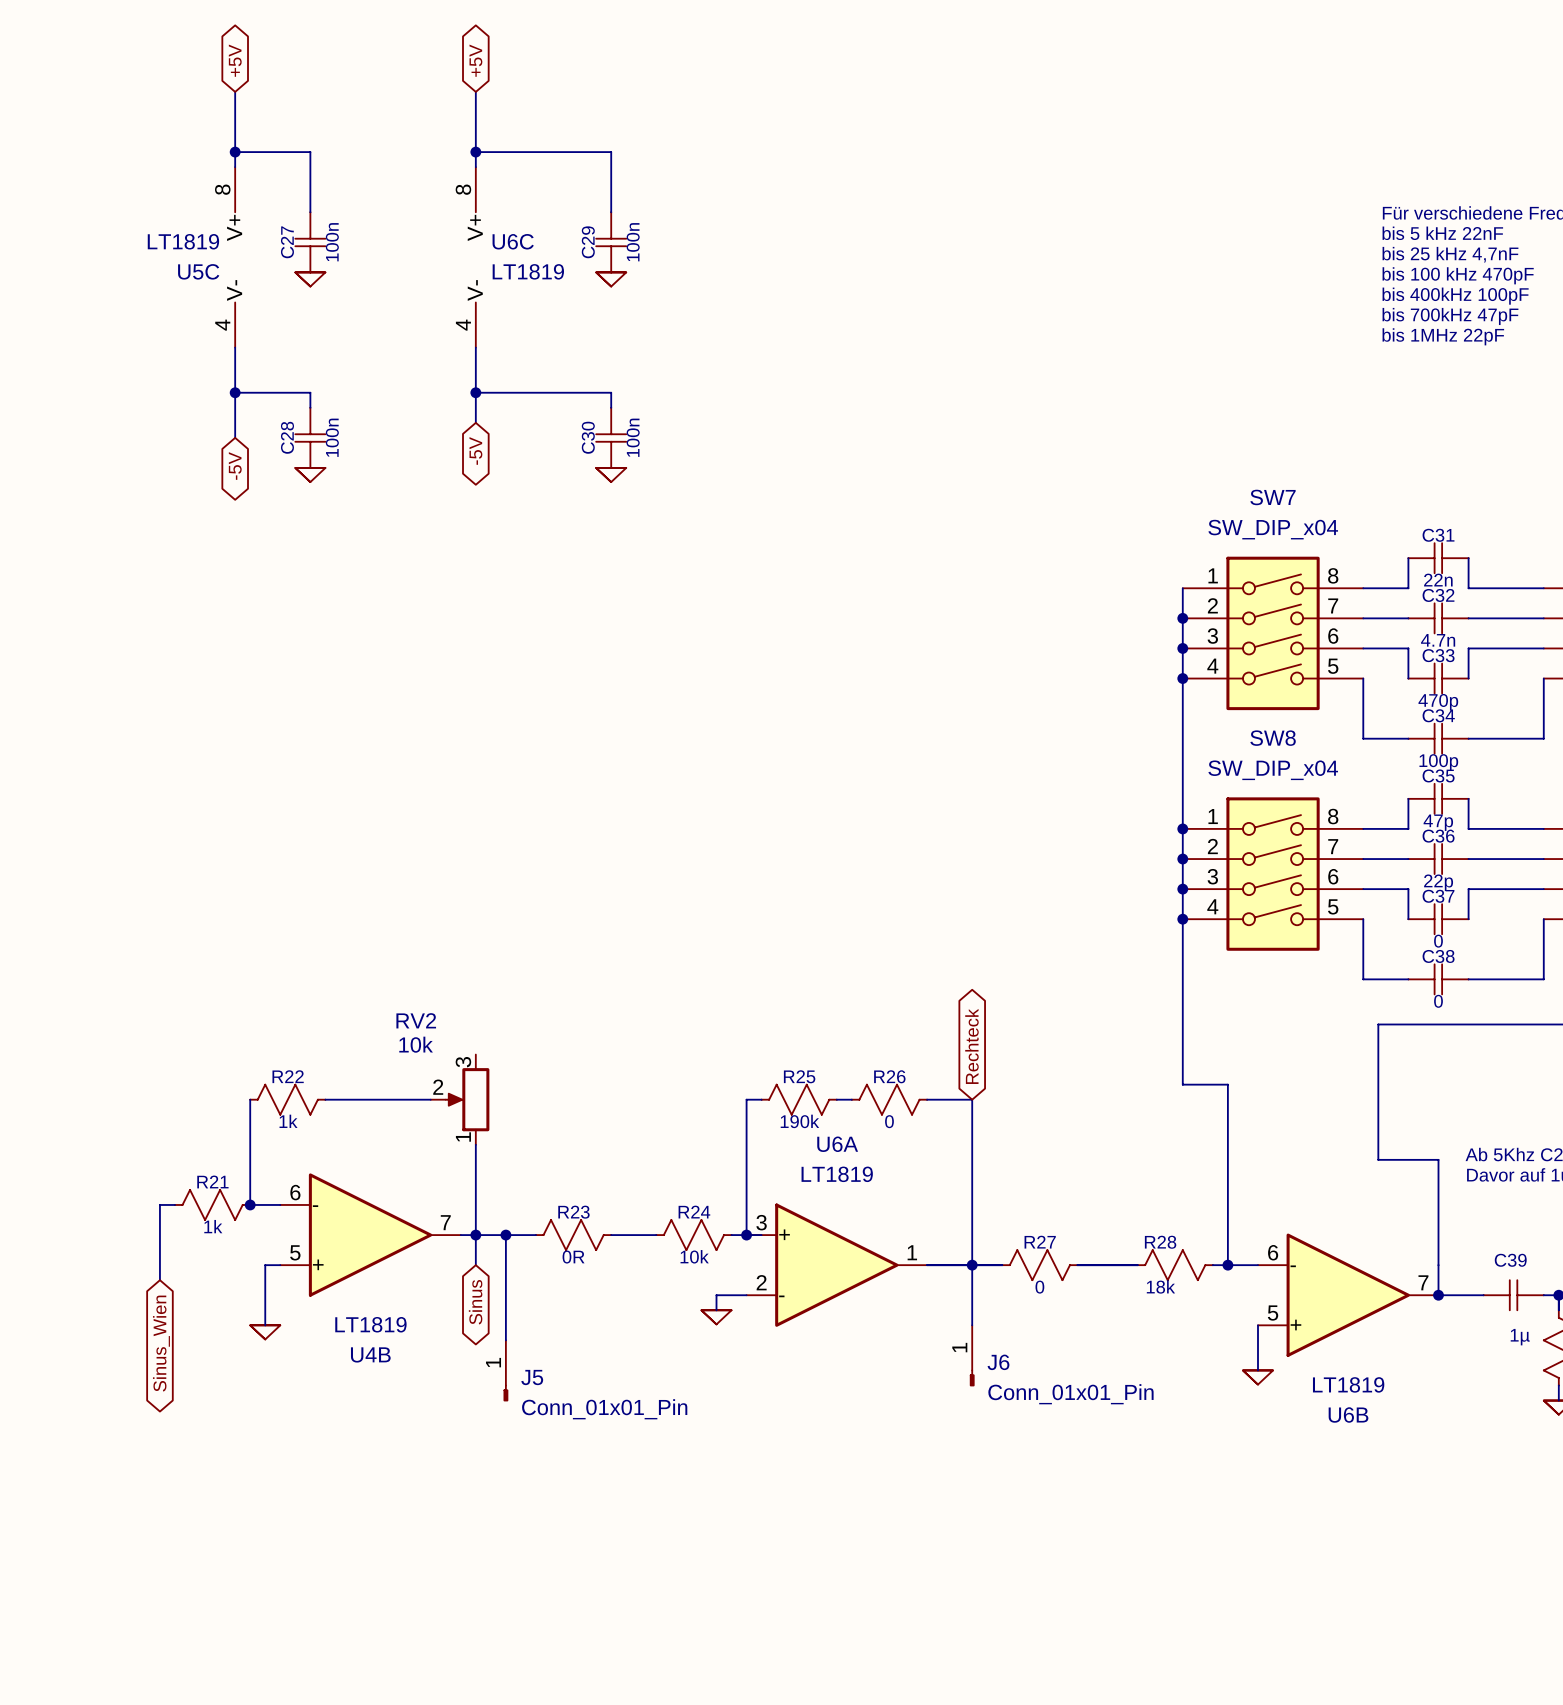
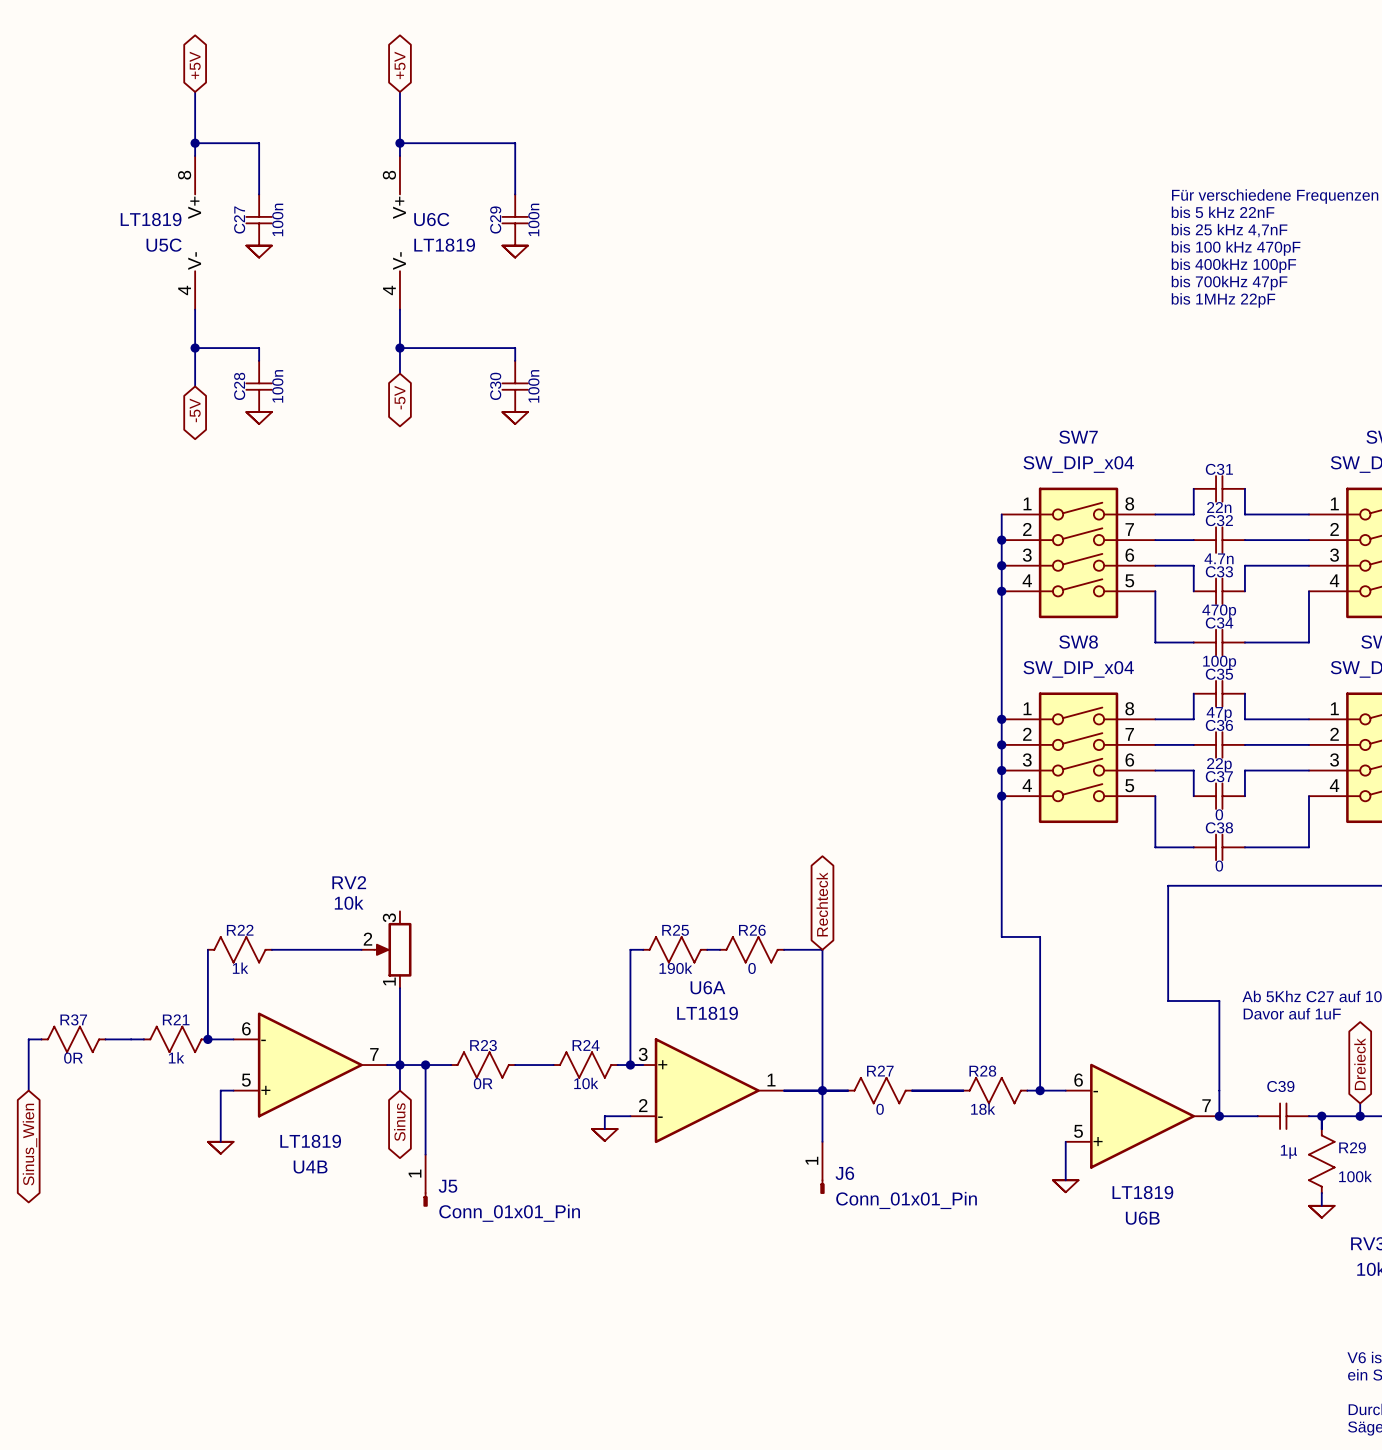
wire: none -> (41, 1039) (28, 1039) (28, 1090)
R37: none -> 0R (73, 1039)
wire: (159, 1204) (159, 1280) -> (131, 1039) (105, 1039)
global label position: Sinus_Wien (161, 1343) -> Sinus_Wien (29, 1144)

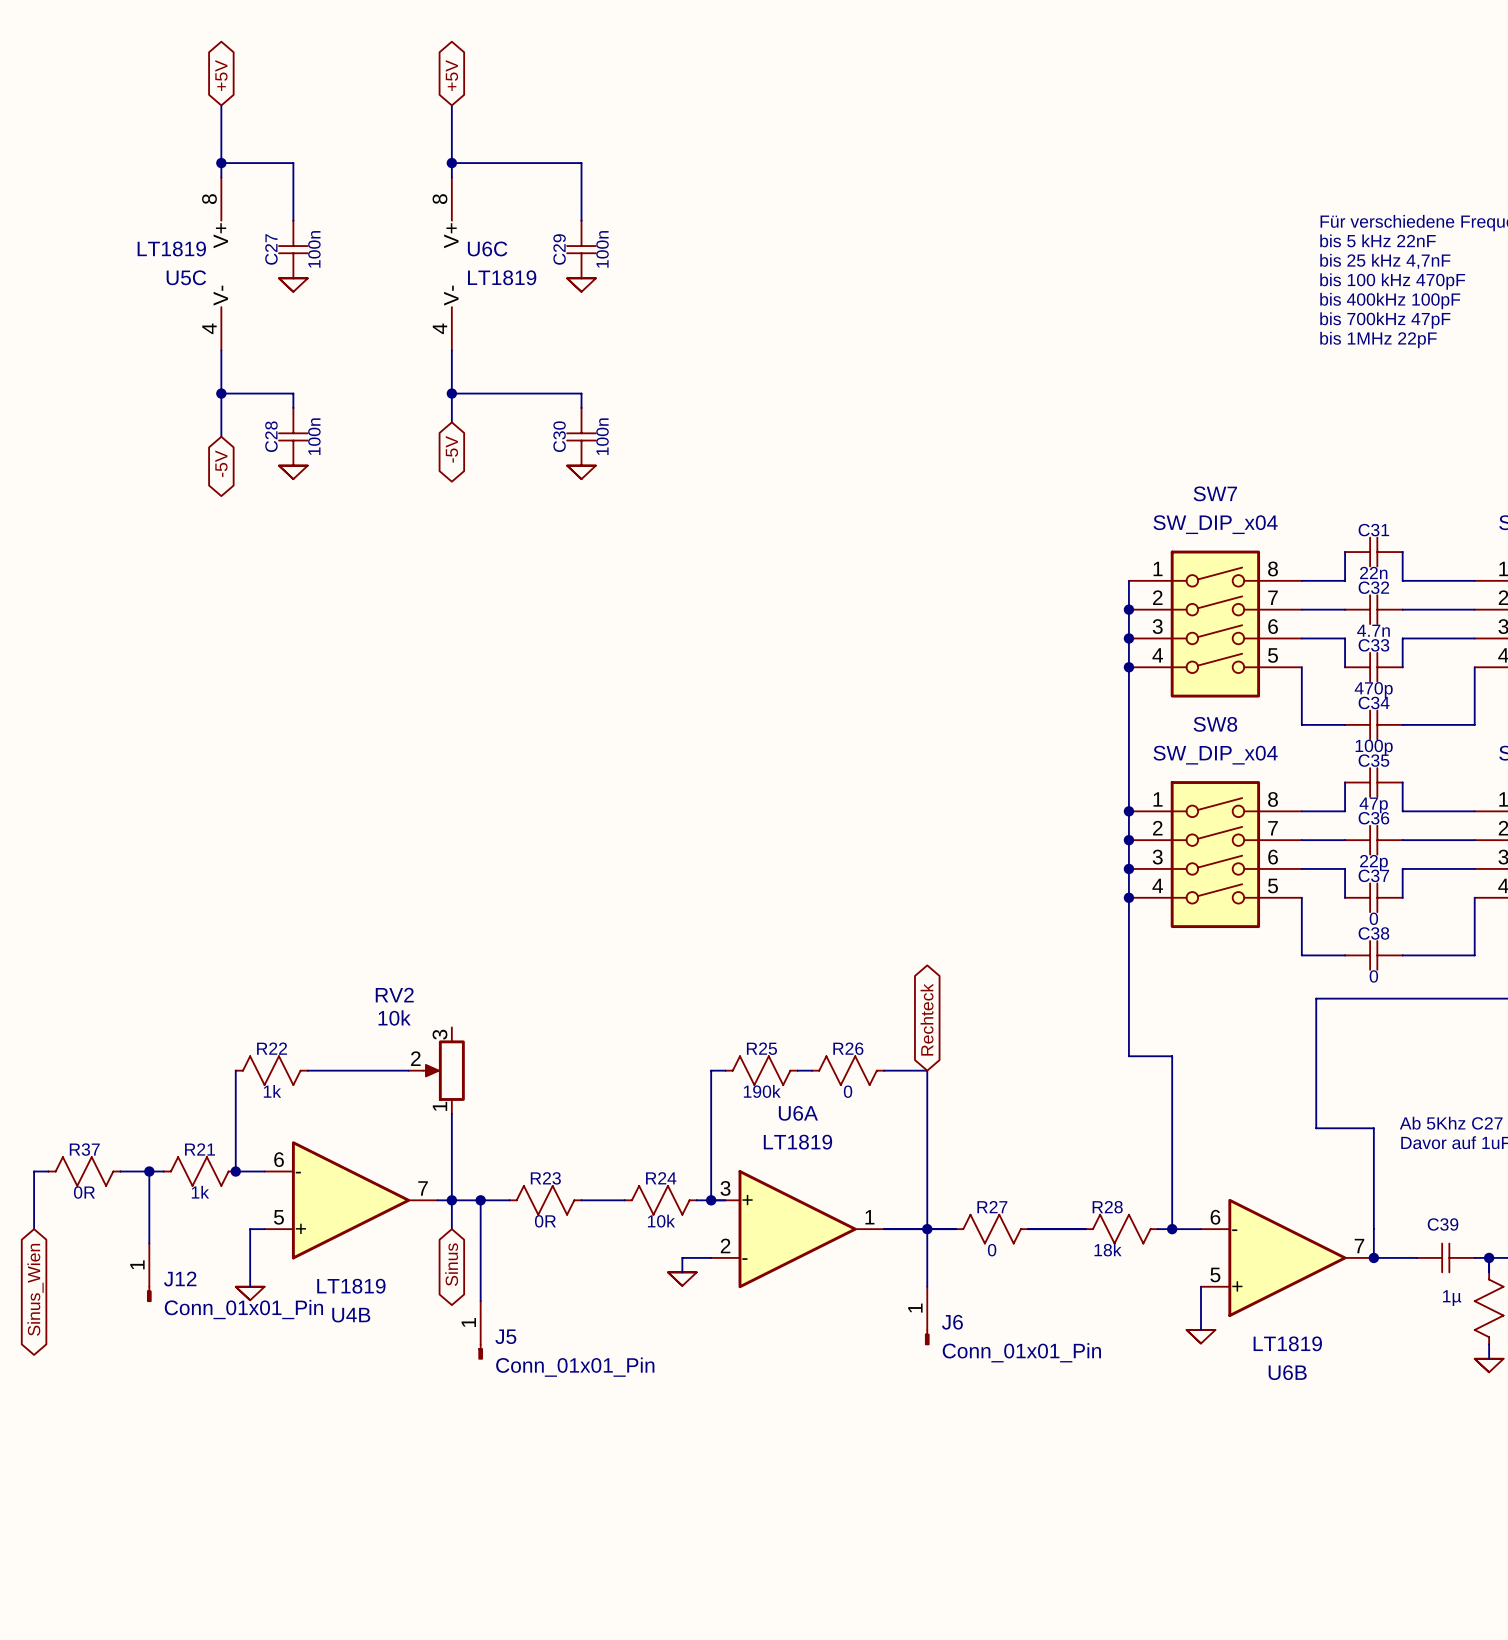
wire: none -> (149, 1171) (149, 1243)
junction: none -> (149, 1171)
J12: none -> Conn_01x01_Pin (149, 1272)

